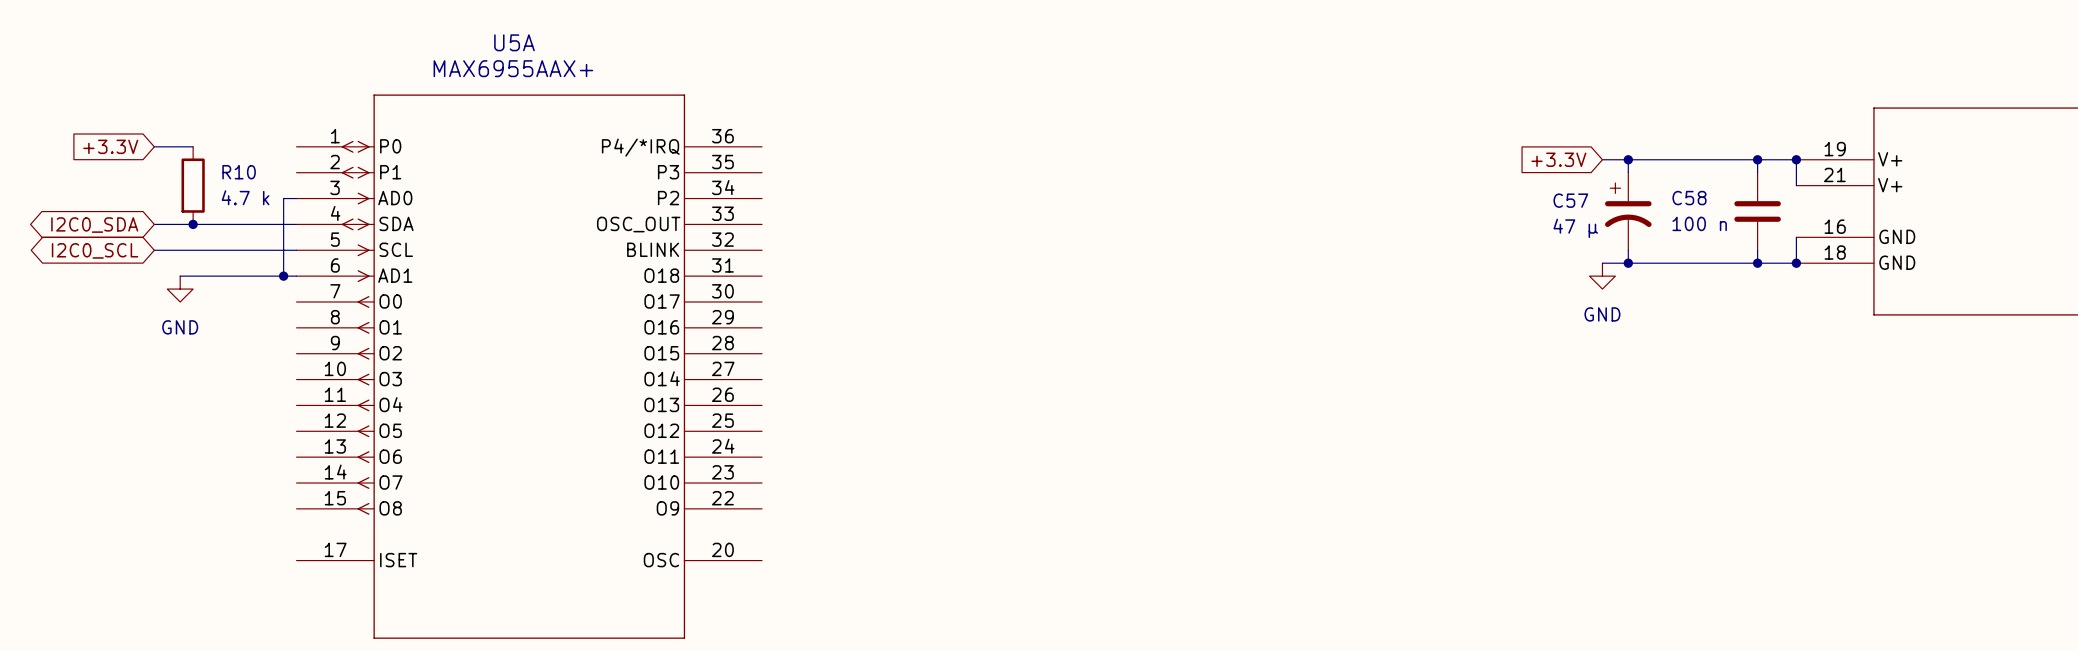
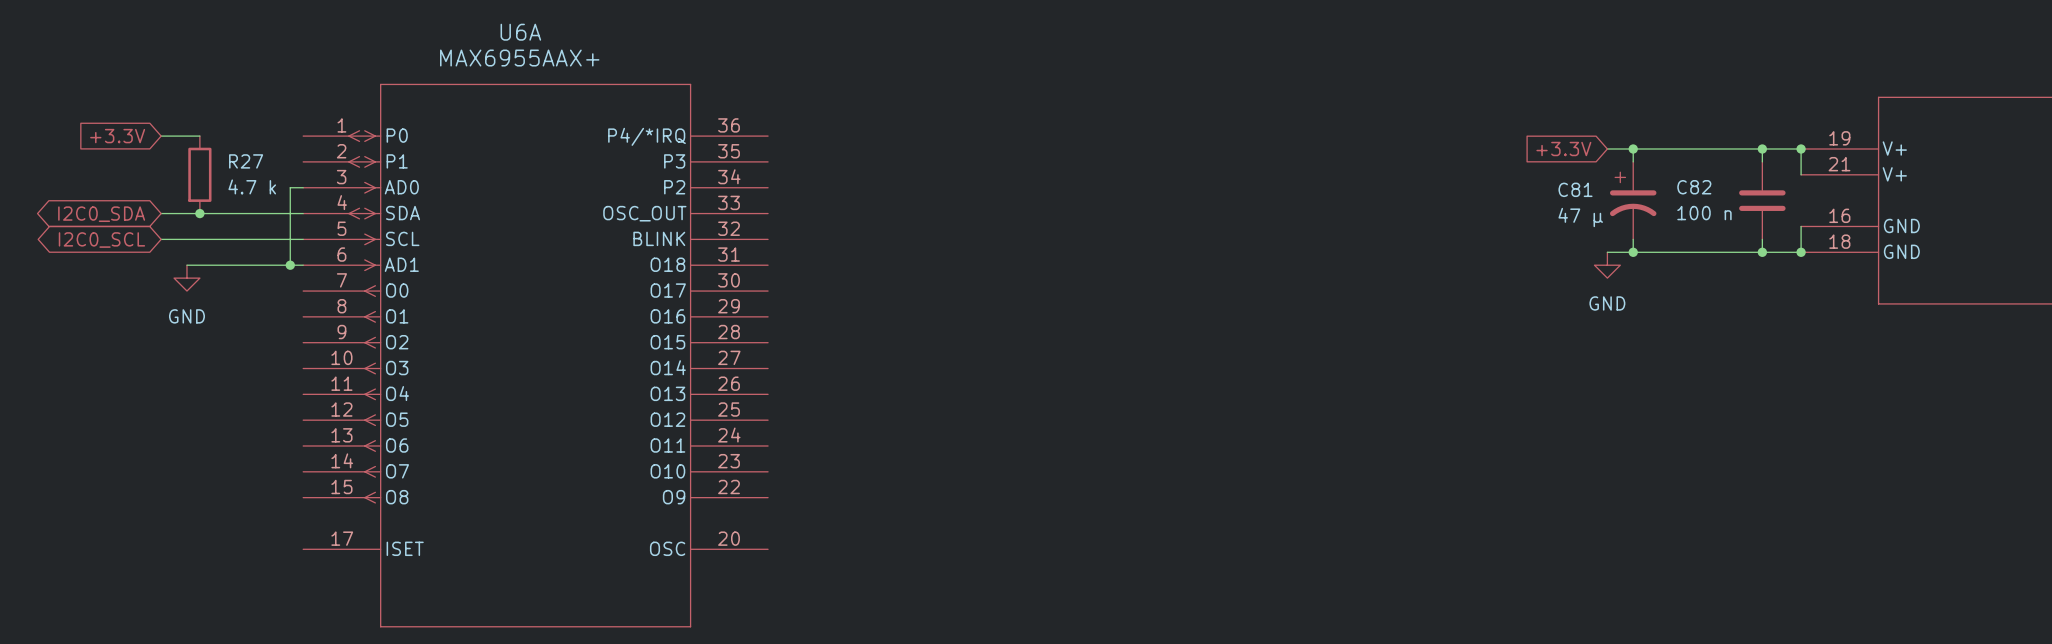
U5A name: U5A (514, 42) -> U6A (520, 32)
R10 name: R10 (239, 172) -> R27 (246, 161)
C58 name: C58 (1689, 198) -> C82 (1694, 187)
C57 name: C57 (1570, 200) -> C81 (1575, 189)

